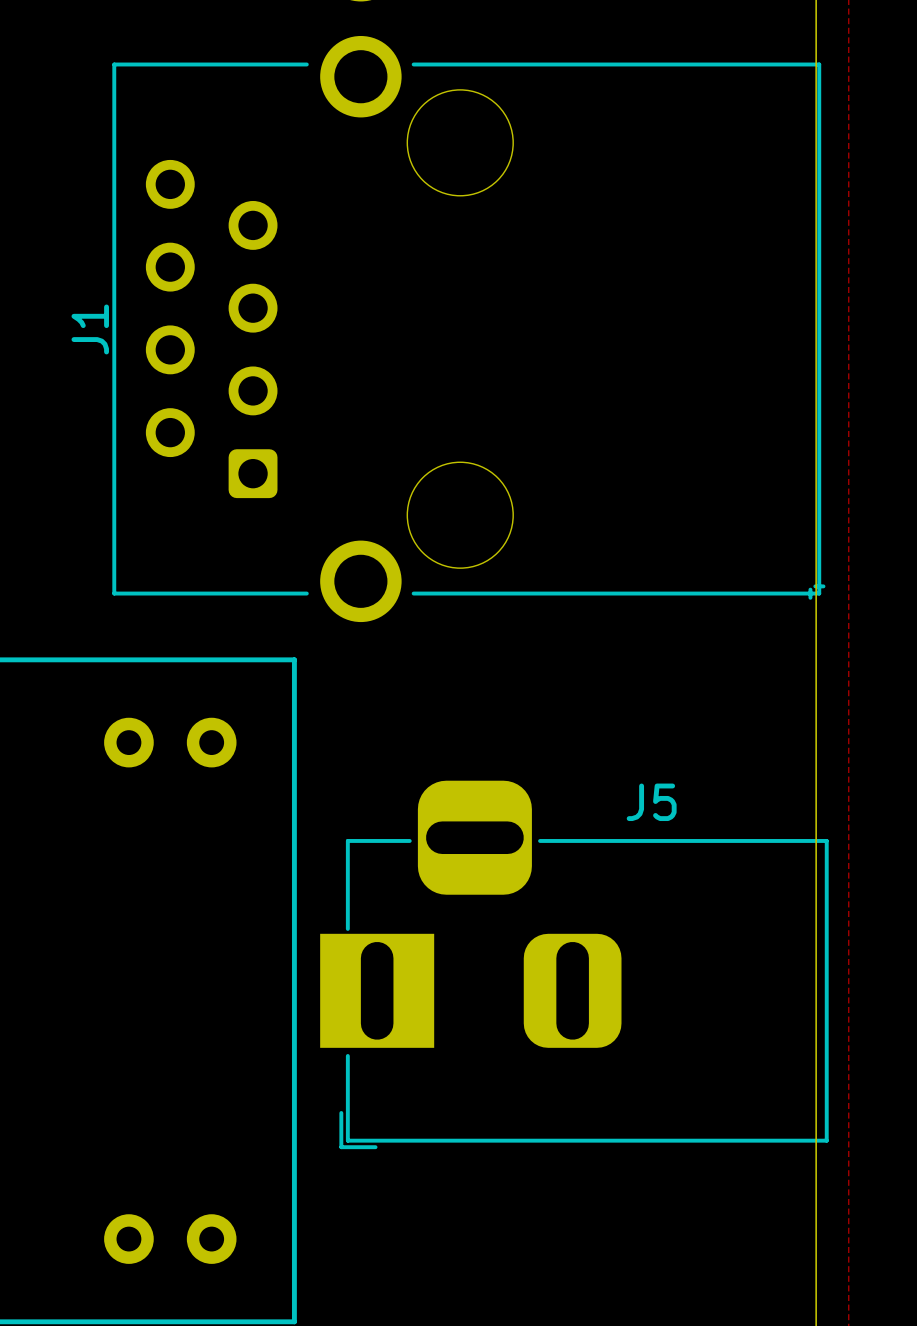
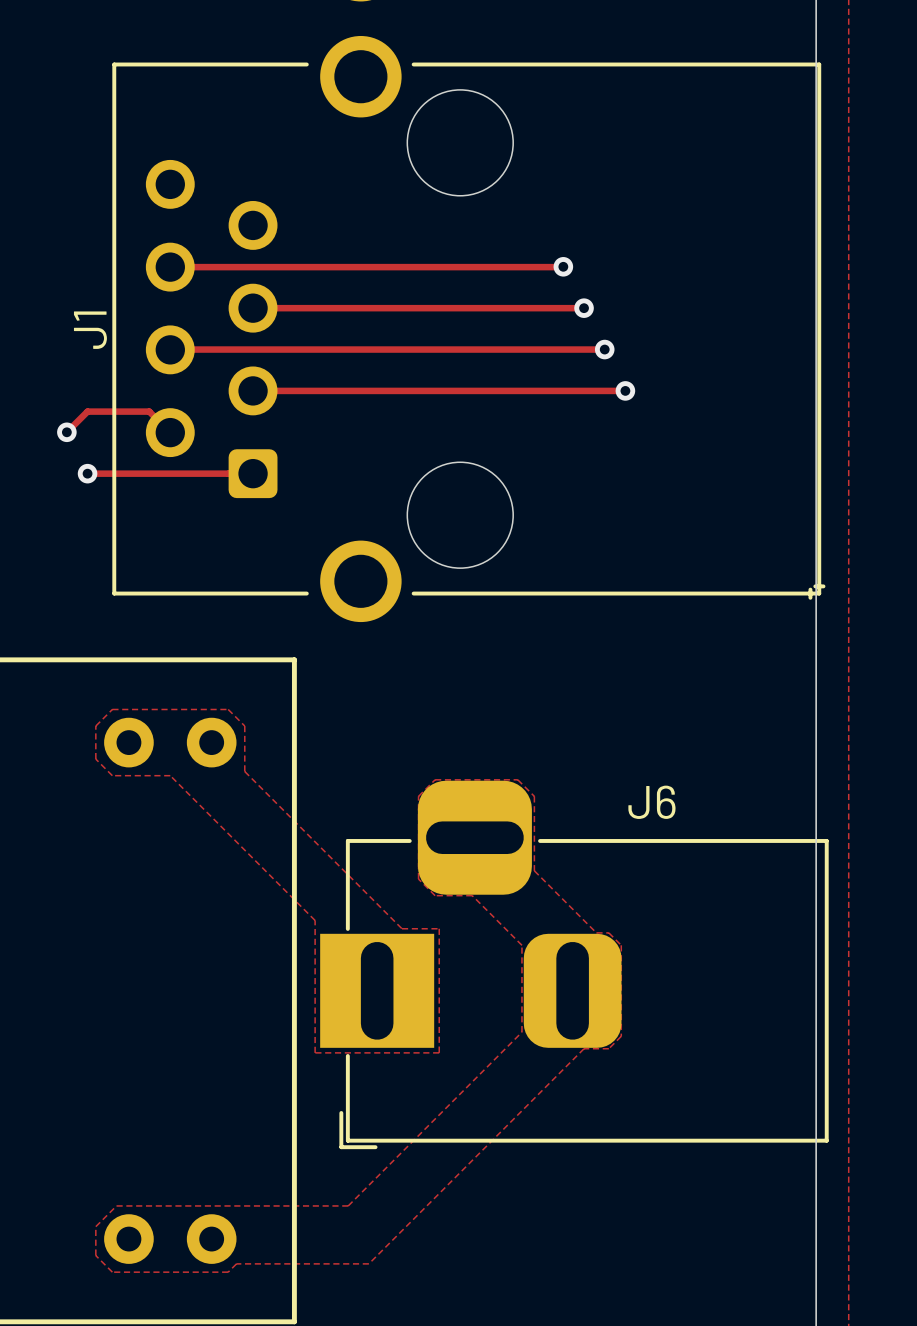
via: none -> (563, 266)
track: none -> (170, 267) (563, 267)
track: none -> (253, 308) (584, 308)
via: none -> (584, 308)
track: none -> (170, 349) (604, 349)
via: none -> (604, 349)
track: none -> (253, 390) (625, 390)
via: none -> (625, 390)
track: none -> (66, 432) (87, 411) (149, 411) (170, 432)
via: none -> (66, 432)
track: none -> (87, 473) (253, 473)
via: none -> (87, 473)
zone outline: none -> (112, 709) (95, 726) (95, 759) (112, 775) (170, 775) (315, 920) (315, 1052) (439, 1052) (439, 928) (401, 928) (244, 771) (244, 726) (228, 709) (112, 709)
zone outline: none -> (435, 779) (418, 796) (418, 879) (435, 895) (472, 895) (521, 945) (521, 1032) (348, 1205) (116, 1205) (95, 1226) (95, 1255) (112, 1272) (228, 1272) (236, 1263) (368, 1263) (584, 1048) (608, 1048) (621, 1036) (621, 945) (608, 932) (596, 932) (534, 870) (534, 796) (517, 779) (435, 779)
J5 name: J5 (651, 802) -> J6 (651, 802)

